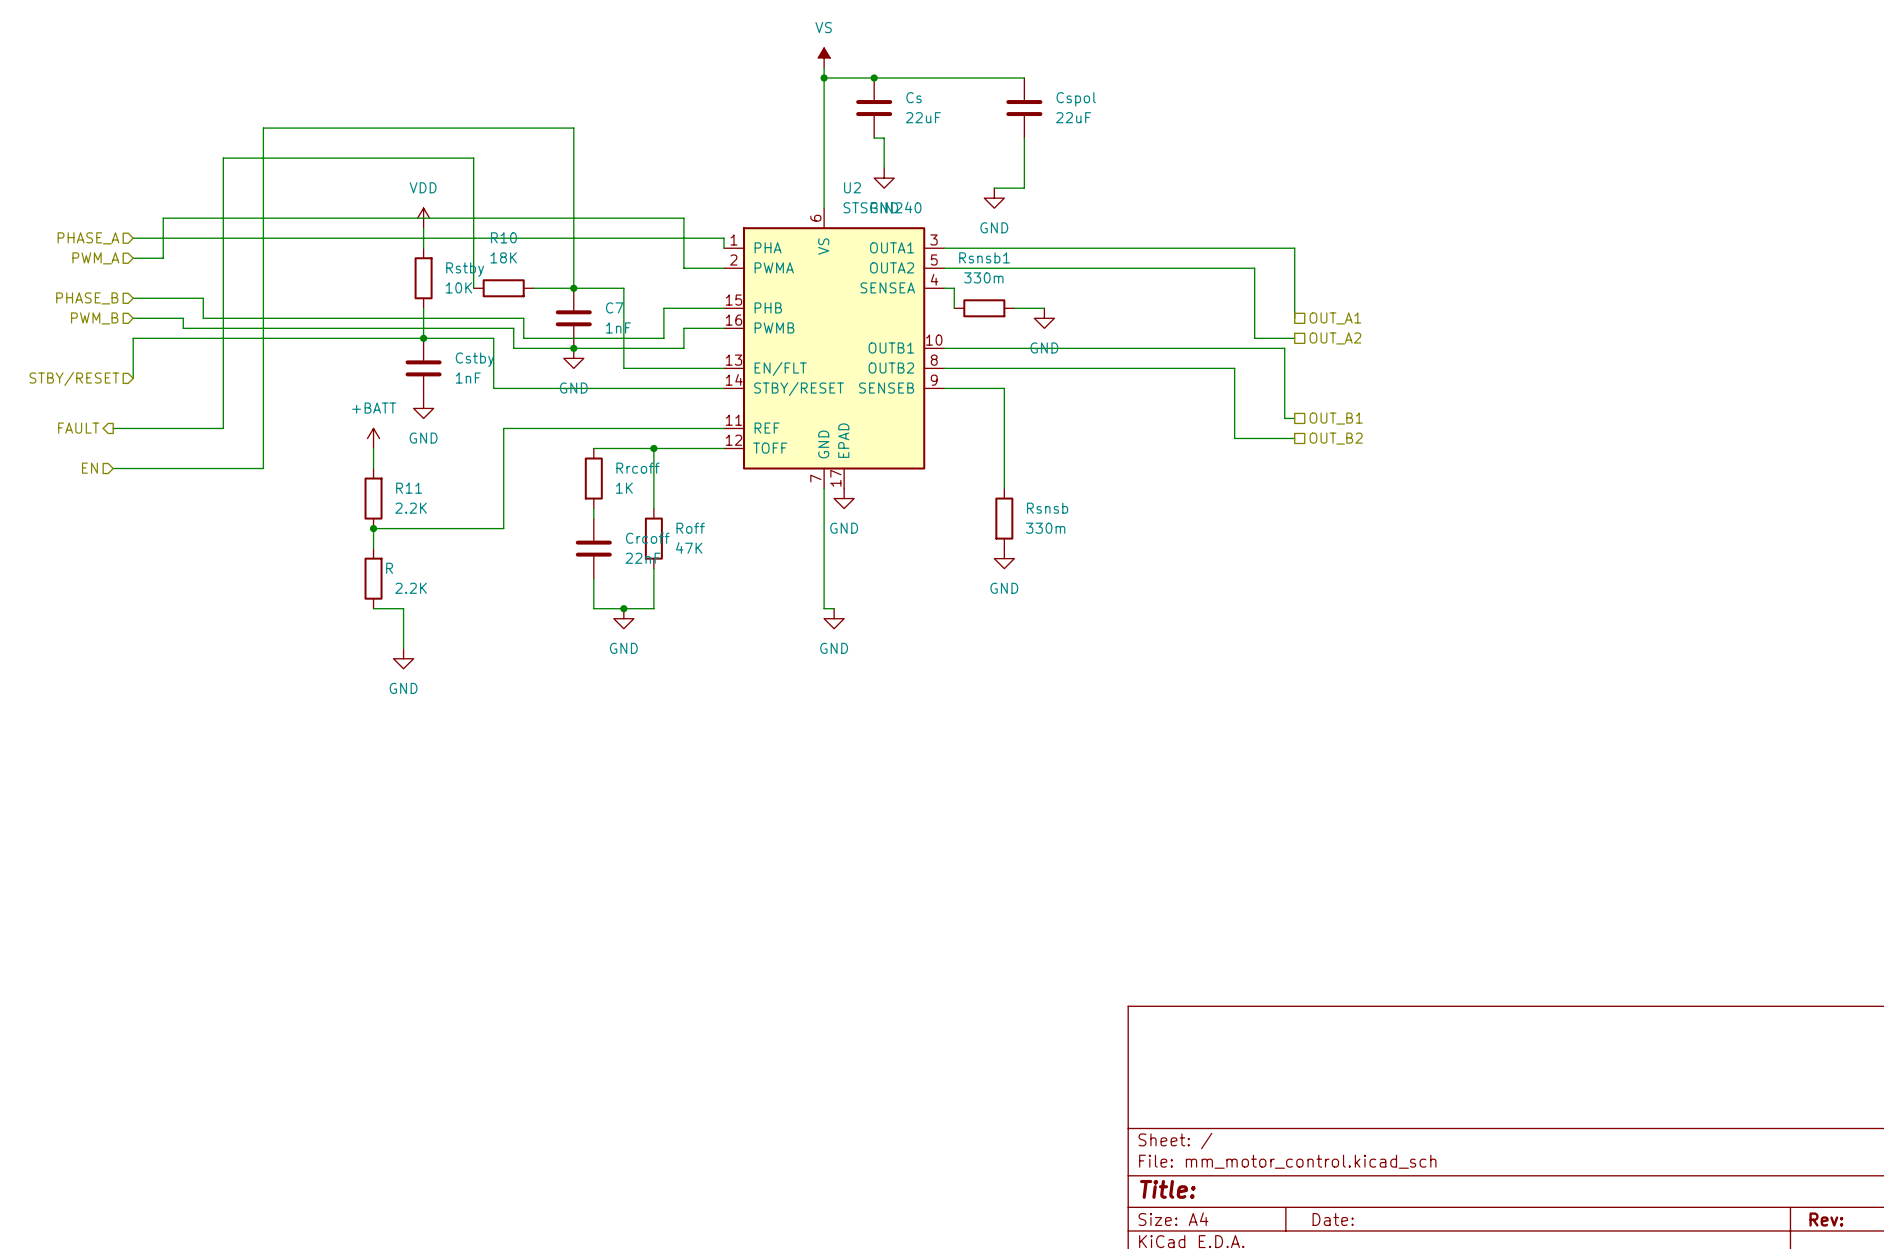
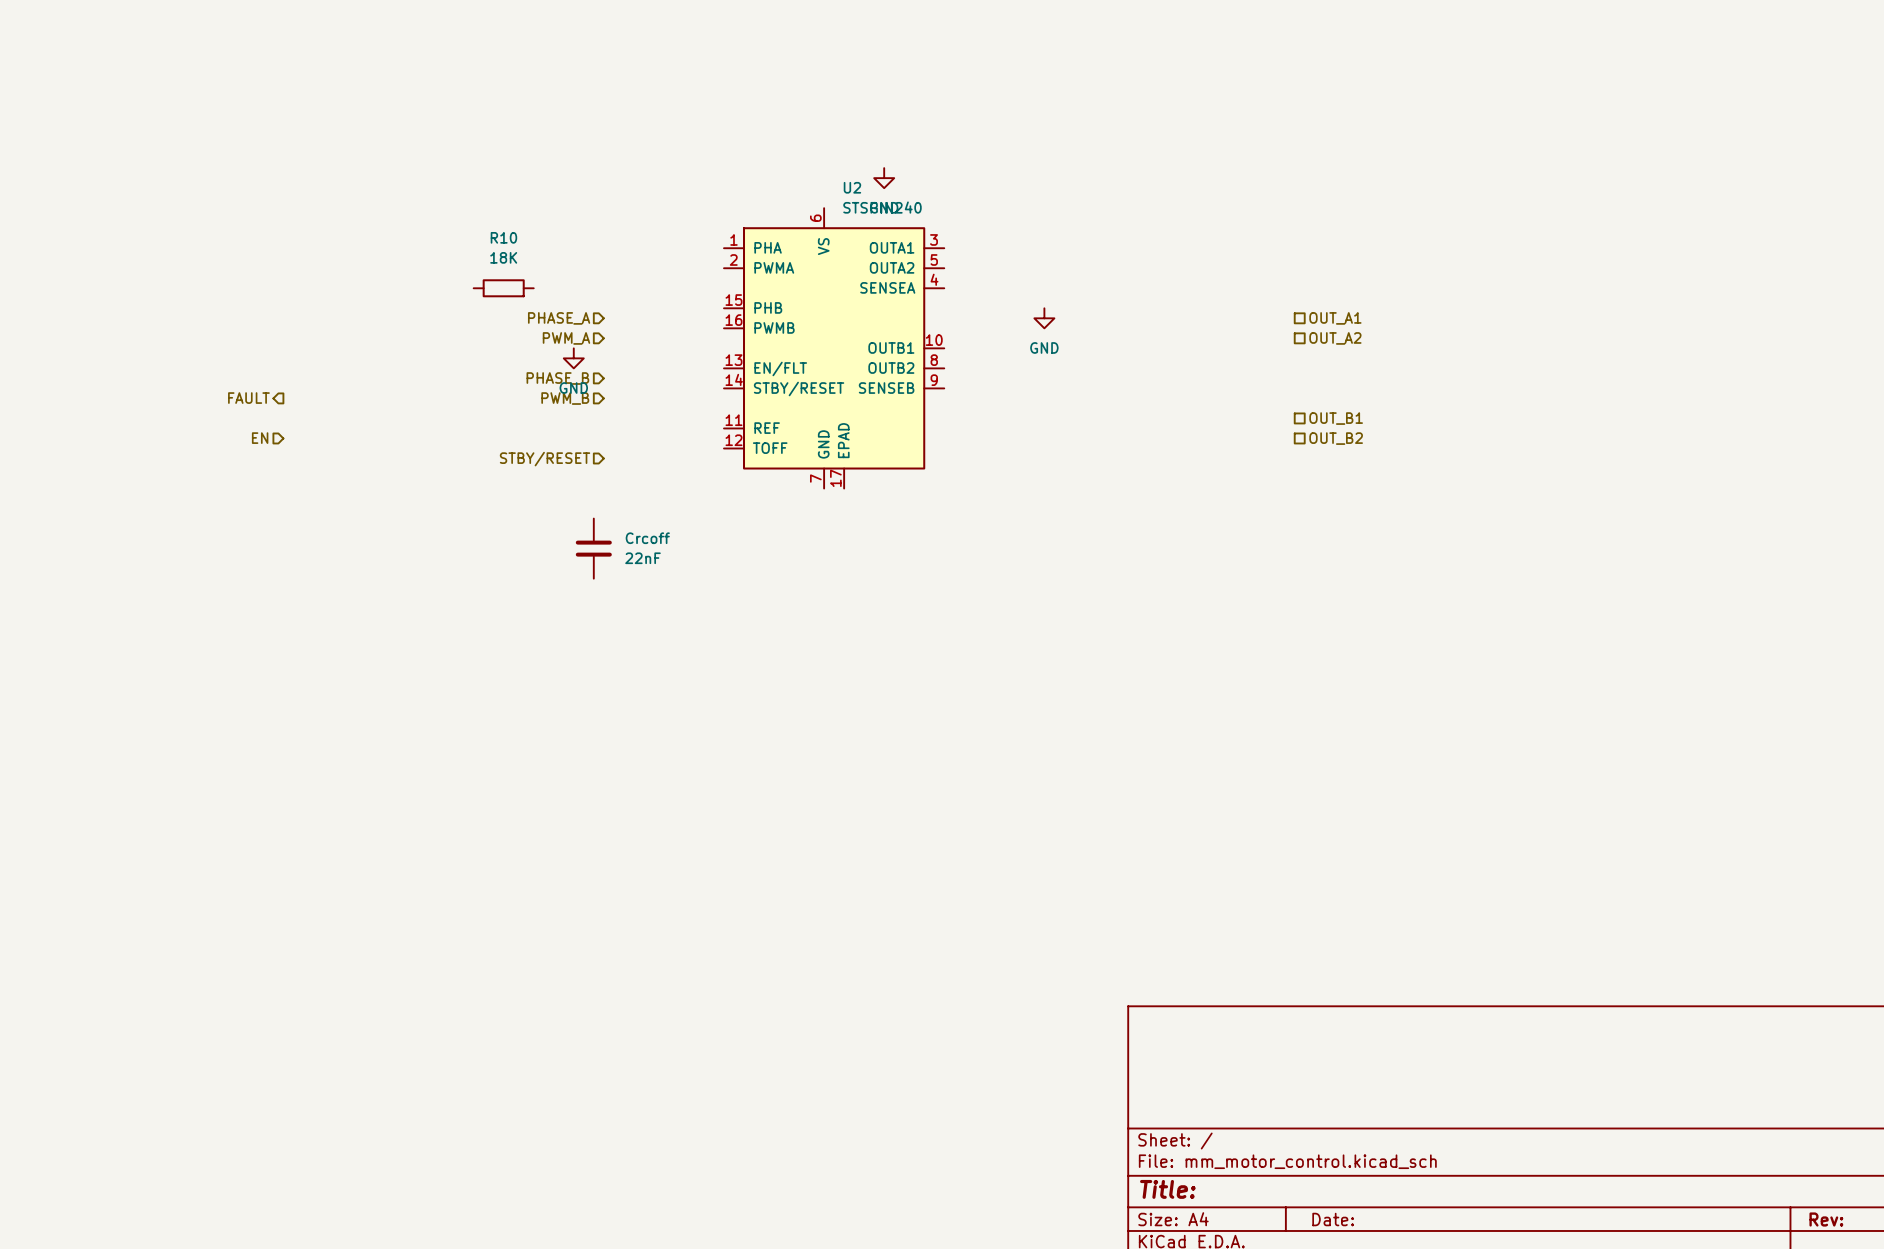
power symbol: VS (824, 57) -> none
wire: (824, 67) (824, 208) -> none
wire: (824, 78) (1024, 78) -> none
junction: (824, 78) -> none
junction: (874, 78) -> none
Cs: 22uF (874, 108) -> none
Cspol: 22uF (1024, 108) -> none
wire: (874, 138) (884, 138) (884, 168) -> none
wire: (1024, 138) (1024, 188) (994, 188) -> none
power symbol: GND (994, 198) -> none
power symbol: VDD (423, 218) -> none
wire: (423, 228) (423, 248) -> none
hierarchical label: PHASE_A (88, 238) -> none
wire: (133, 238) (723, 238) (723, 248) -> none
wire: (944, 248) (1294, 248) (1294, 318) -> none
hierarchical label: PWM_A (95, 258) -> none
wire: (133, 258) (163, 258) (163, 218) (683, 218) (683, 268) (723, 268) -> none
wire: (944, 268) (1254, 268) (1254, 338) (1294, 338) -> none
Rstby: 10K (423, 278) -> none
wire: (473, 288) (473, 158) (223, 158) (223, 428) (113, 428) -> none
wire: (533, 288) (623, 288) (623, 368) (723, 368) -> none
wire: (573, 288) (573, 128) (263, 128) (263, 468) (113, 468) -> none
junction: (573, 288) -> none
wire: (944, 288) (954, 288) (954, 308) -> none
hierarchical label: PHASE_B (87, 298) -> none
wire: (133, 298) (203, 298) (203, 318) (523, 318) (523, 338) (663, 338) (663, 308) (723, 308) -> none
wire: (423, 308) (423, 338) -> none
Rsnsb1: 330m (984, 308) -> none
wire: (1014, 308) (1044, 308) -> none
hierarchical label: PWM_B (94, 318) -> none
wire: (133, 318) (183, 318) (183, 328) (513, 328) (513, 348) (683, 348) (683, 328) (723, 328) -> none
hierarchical label: none -> PHASE_A (559, 318)
C7: 1nF (573, 318) -> none
junction: (423, 338) -> none
hierarchical label: none -> PWM_A (566, 338)
junction: (573, 348) -> none
wire: (944, 348) (1284, 348) (1284, 418) (1294, 418) -> none
Cstby: 1nF (423, 368) -> none
wire: (944, 368) (1234, 368) (1234, 438) (1294, 438) -> none
hierarchical label: STBY/RESET (74, 378) -> none
wire: (133, 378) (133, 338) (493, 338) (493, 388) (723, 388) -> none
hierarchical label: none -> PHASE_B (557, 378)
wire: (944, 388) (1004, 388) (1004, 488) -> none
hierarchical label: none -> PWM_B (565, 398)
power symbol: GND (423, 408) -> none
hierarchical label position: FAULT (78, 428) -> FAULT (248, 398)
wire: (723, 428) (503, 428) (503, 528) (373, 528) (373, 548) -> none
power symbol: +BATT (373, 438) -> none
wire: (373, 448) (373, 468) -> none
wire: (593, 448) (723, 448) -> none
wire: (653, 448) (653, 508) -> none
junction: (653, 448) -> none
hierarchical label: none -> STBY/RESET (545, 459)
hierarchical label position: EN (89, 468) -> EN (260, 438)
Rrcoff: 1K (593, 478) -> none
wire: (824, 488) (824, 608) (834, 608) -> none
R11: 2.2K (373, 498) -> none
power symbol: GND (844, 498) -> none
wire: (593, 508) (593, 518) -> none
Rsnsb: 330m (1004, 518) -> none
junction: (373, 528) -> none
Roff: 47K (653, 538) -> none
power symbol: GND (1004, 558) -> none
wire: (653, 568) (653, 608) (593, 608) (593, 578) -> none
R: 2.2K (373, 578) -> none
wire: (373, 608) (403, 608) (403, 648) -> none
junction: (623, 608) -> none
power symbol: GND (623, 618) -> none
power symbol: GND (834, 618) -> none
power symbol: GND (403, 658) -> none

